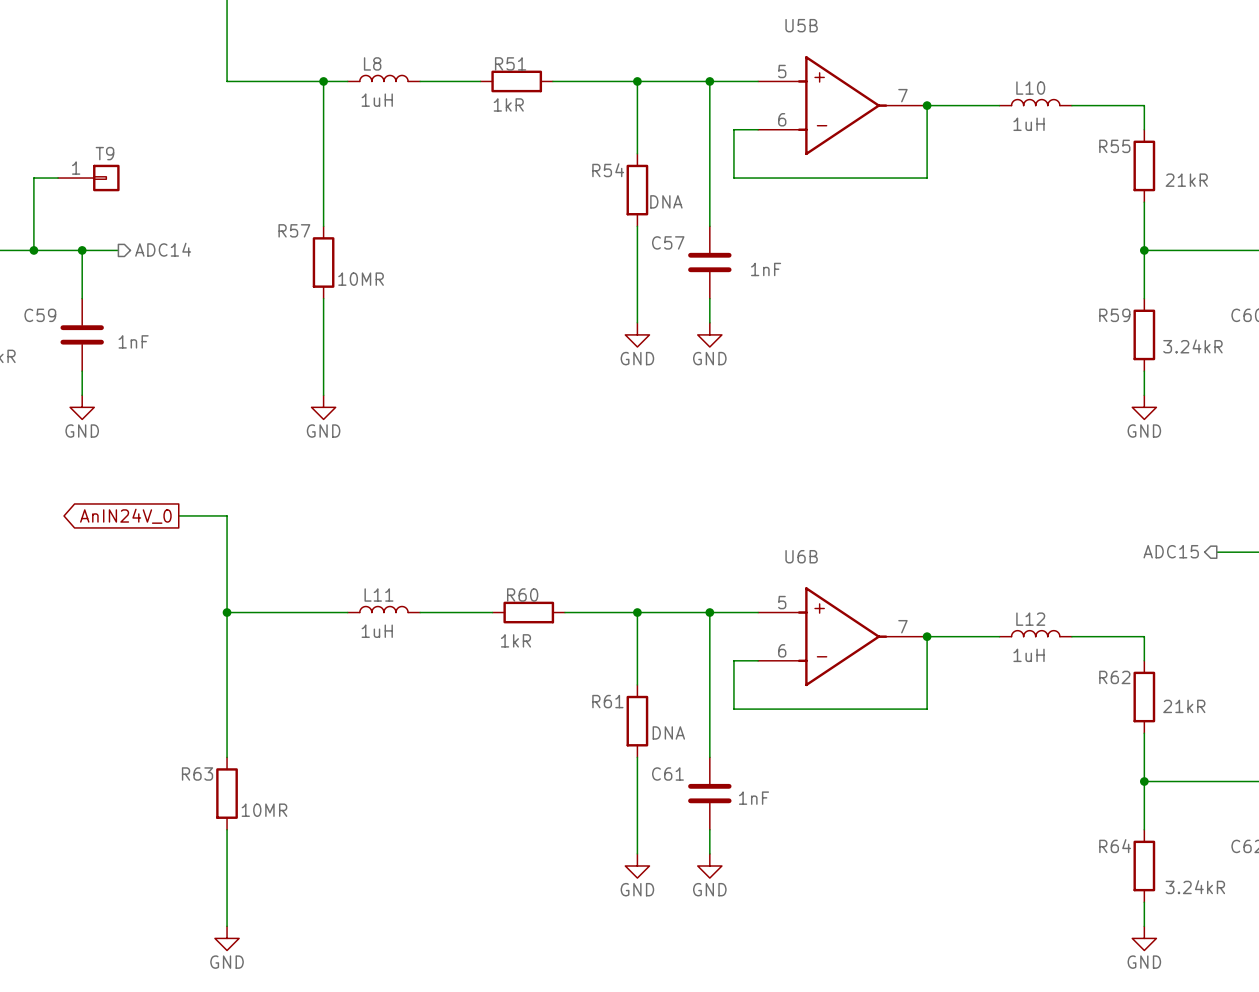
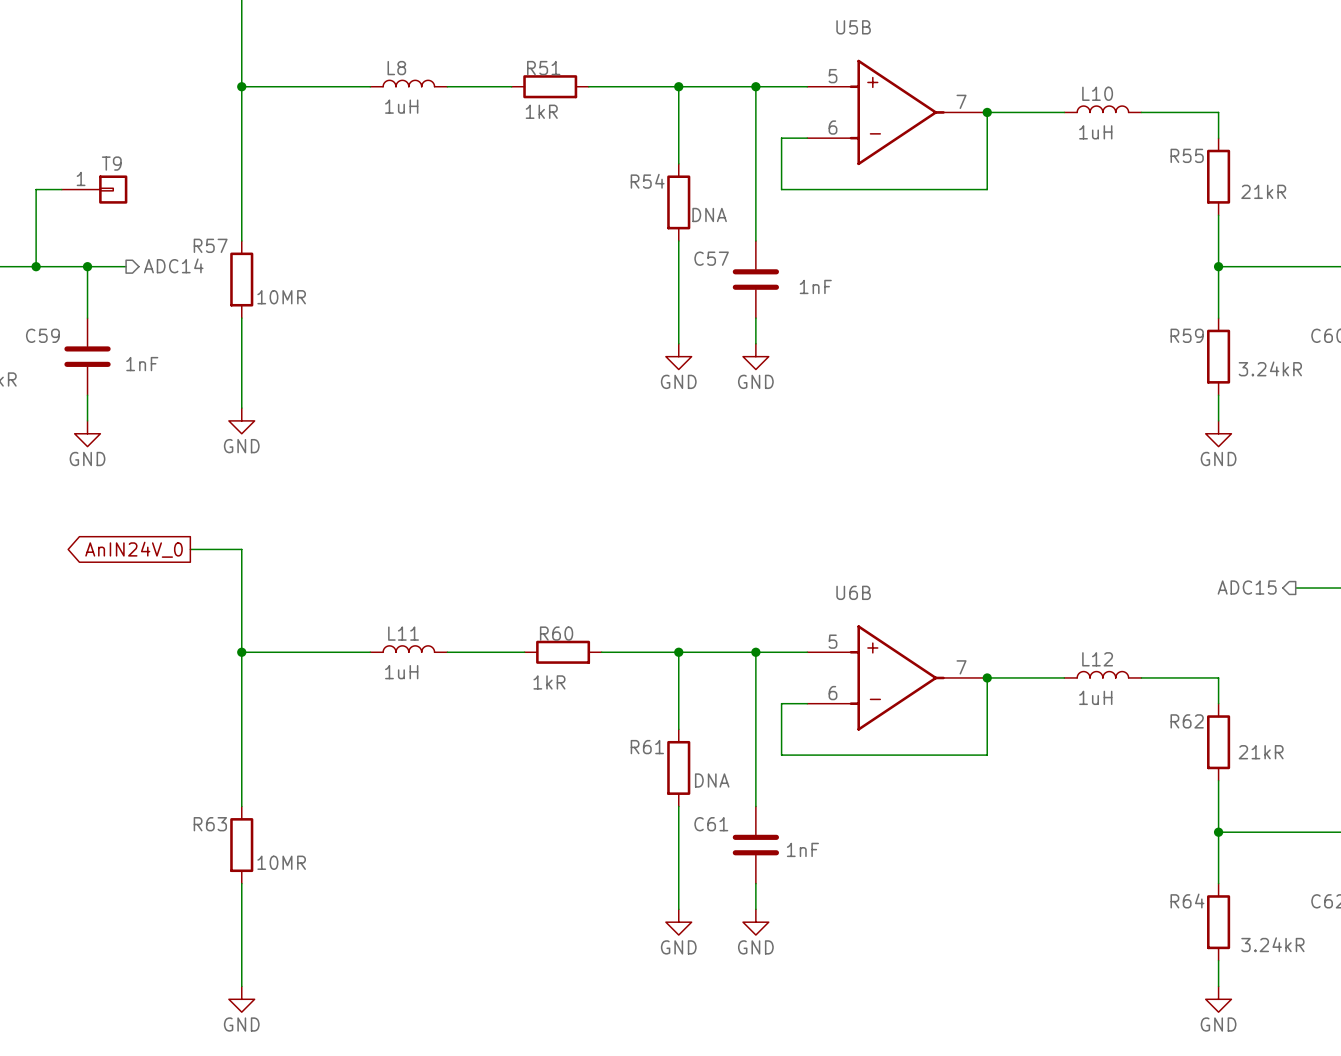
junction: none -> (241, 86)
wire: (323, 81) (323, 226) -> (241, 86) (241, 240)
junction: (323, 81) -> none
R57 position: (323, 262) -> (241, 279)
wire: none -> (241, 318) (241, 408)
wire: (323, 298) (323, 395) -> none
power symbol position: GND (323, 407) -> GND (241, 420)

